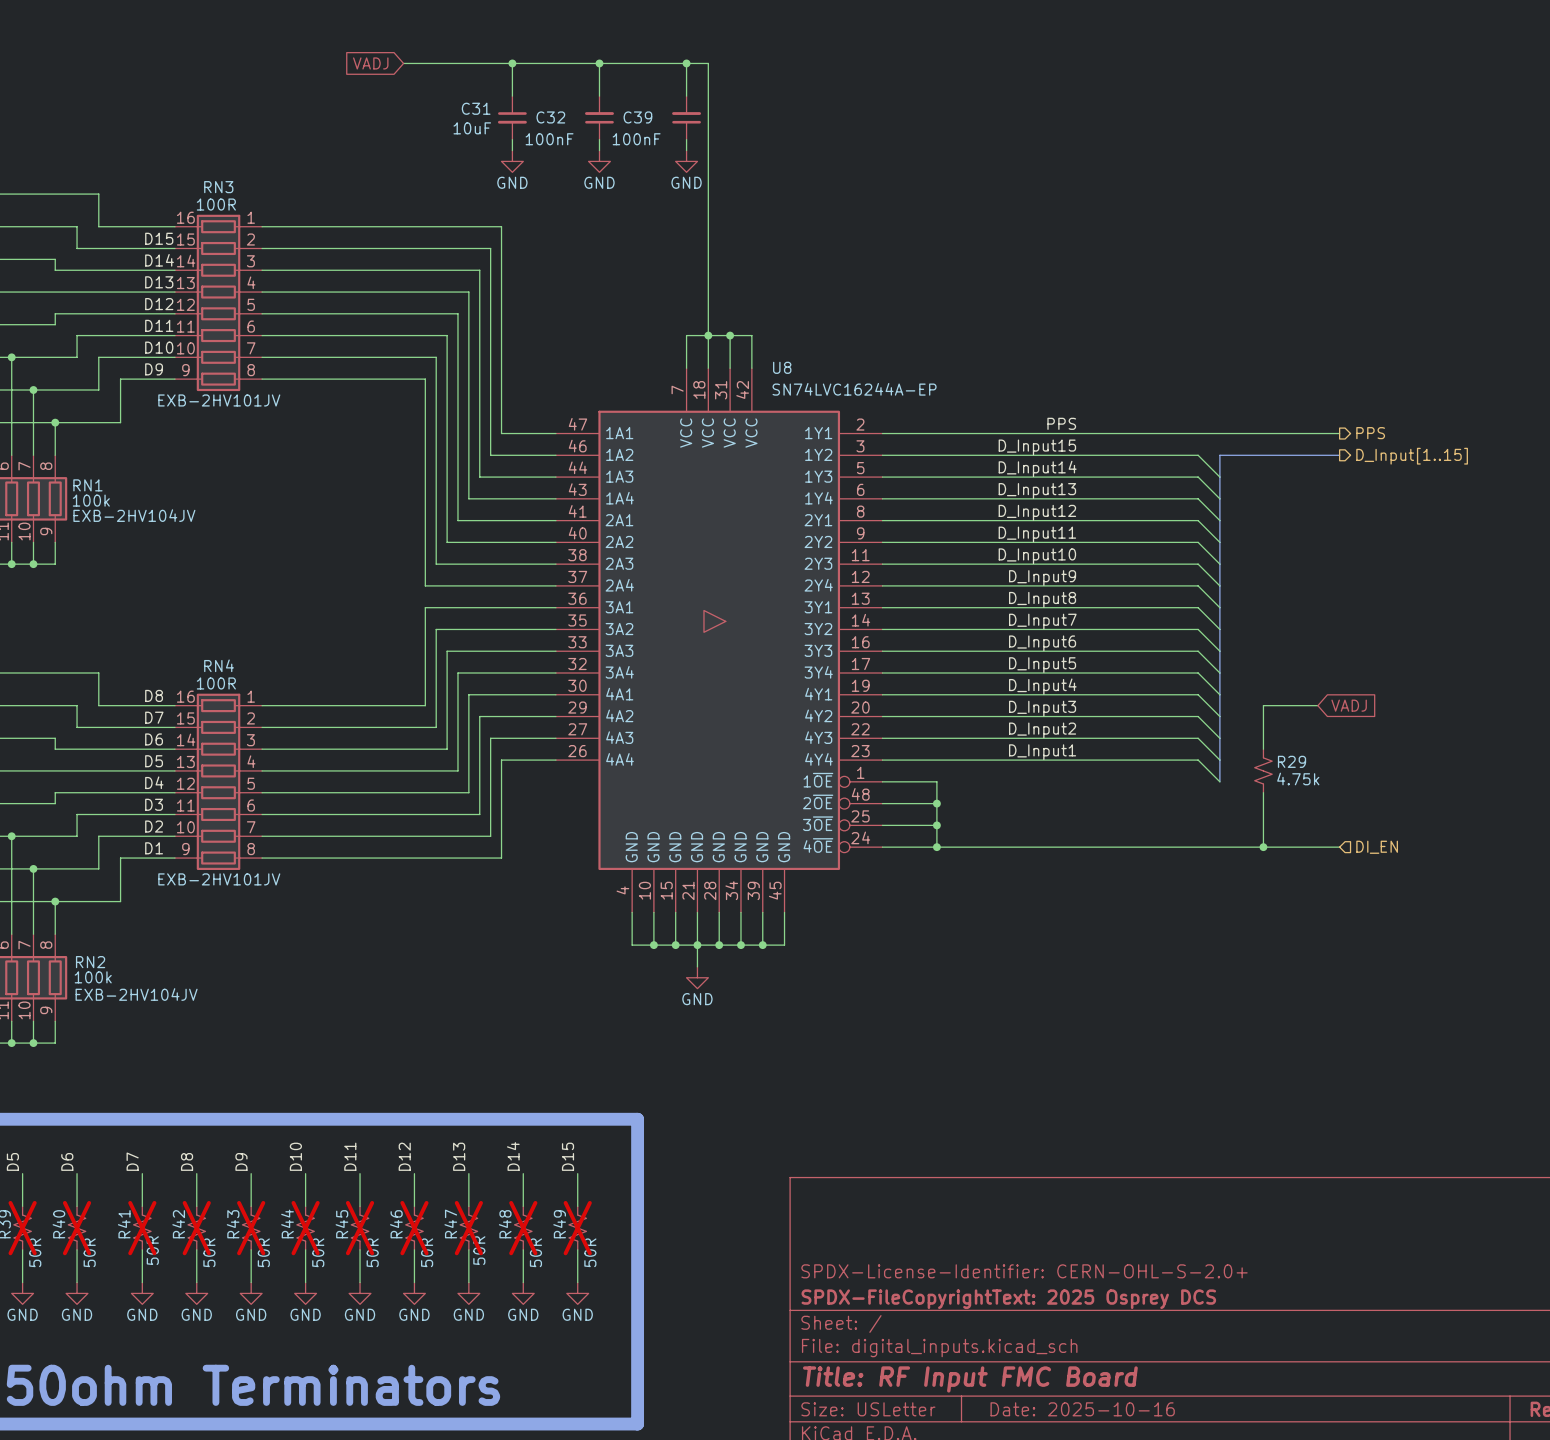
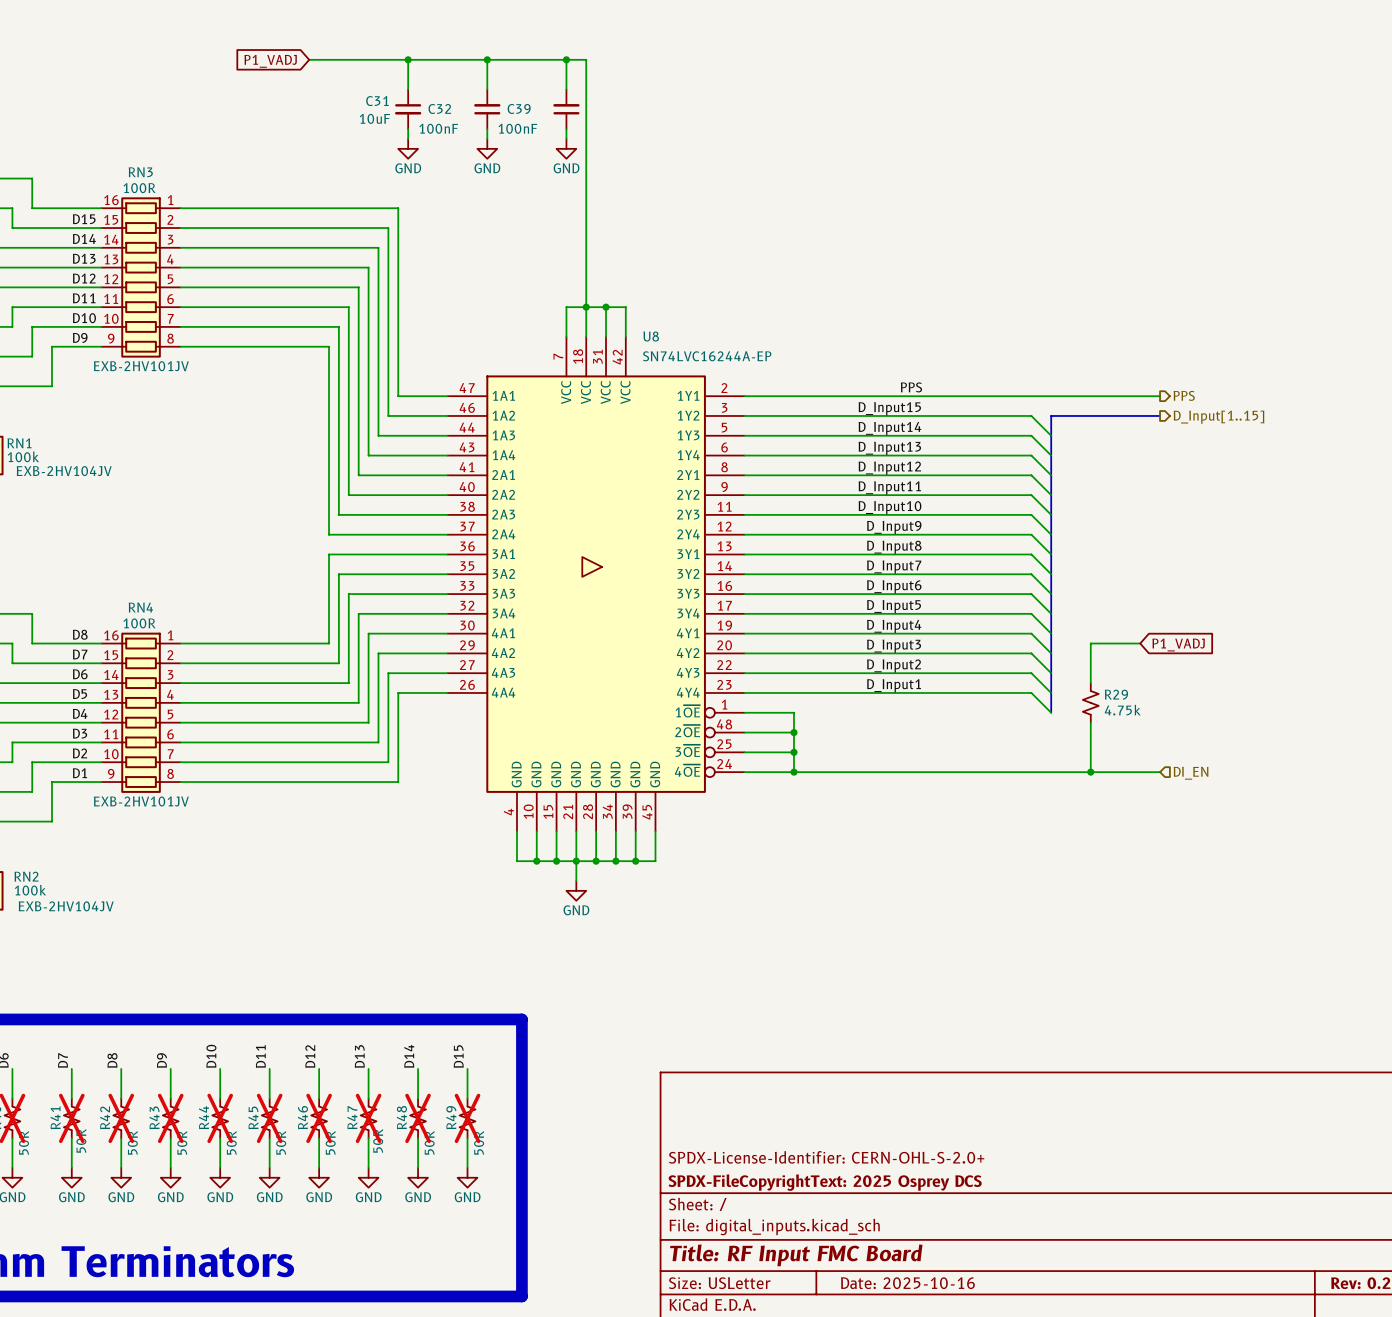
global label: VADJ (370, 63) -> P1_VADJ (270, 61)
global label: VADJ (1349, 705) -> P1_VADJ (1178, 645)

